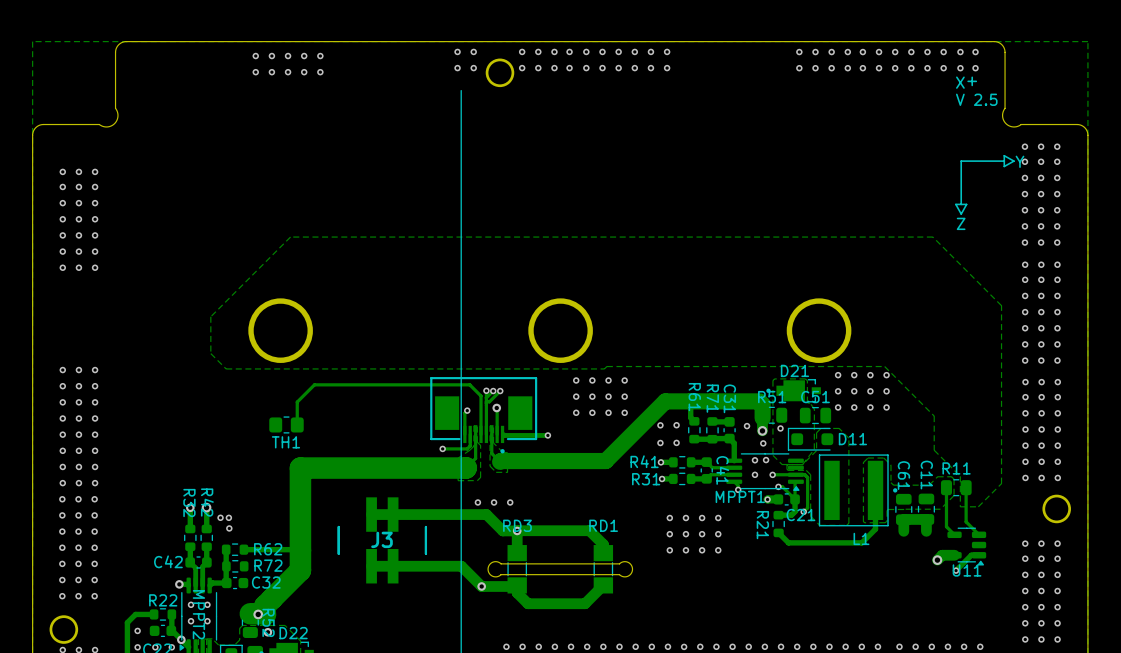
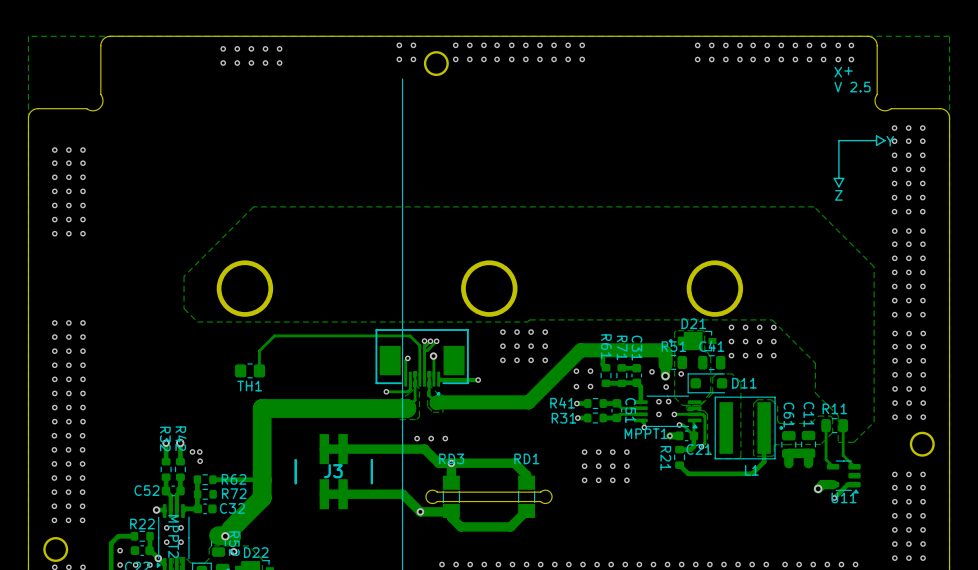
C51 name: C51 (815, 397) -> C41 (711, 346)
C41 name: C41 (722, 470) -> C51 (630, 410)
C42 name: C42 (168, 561) -> C52 (147, 490)

